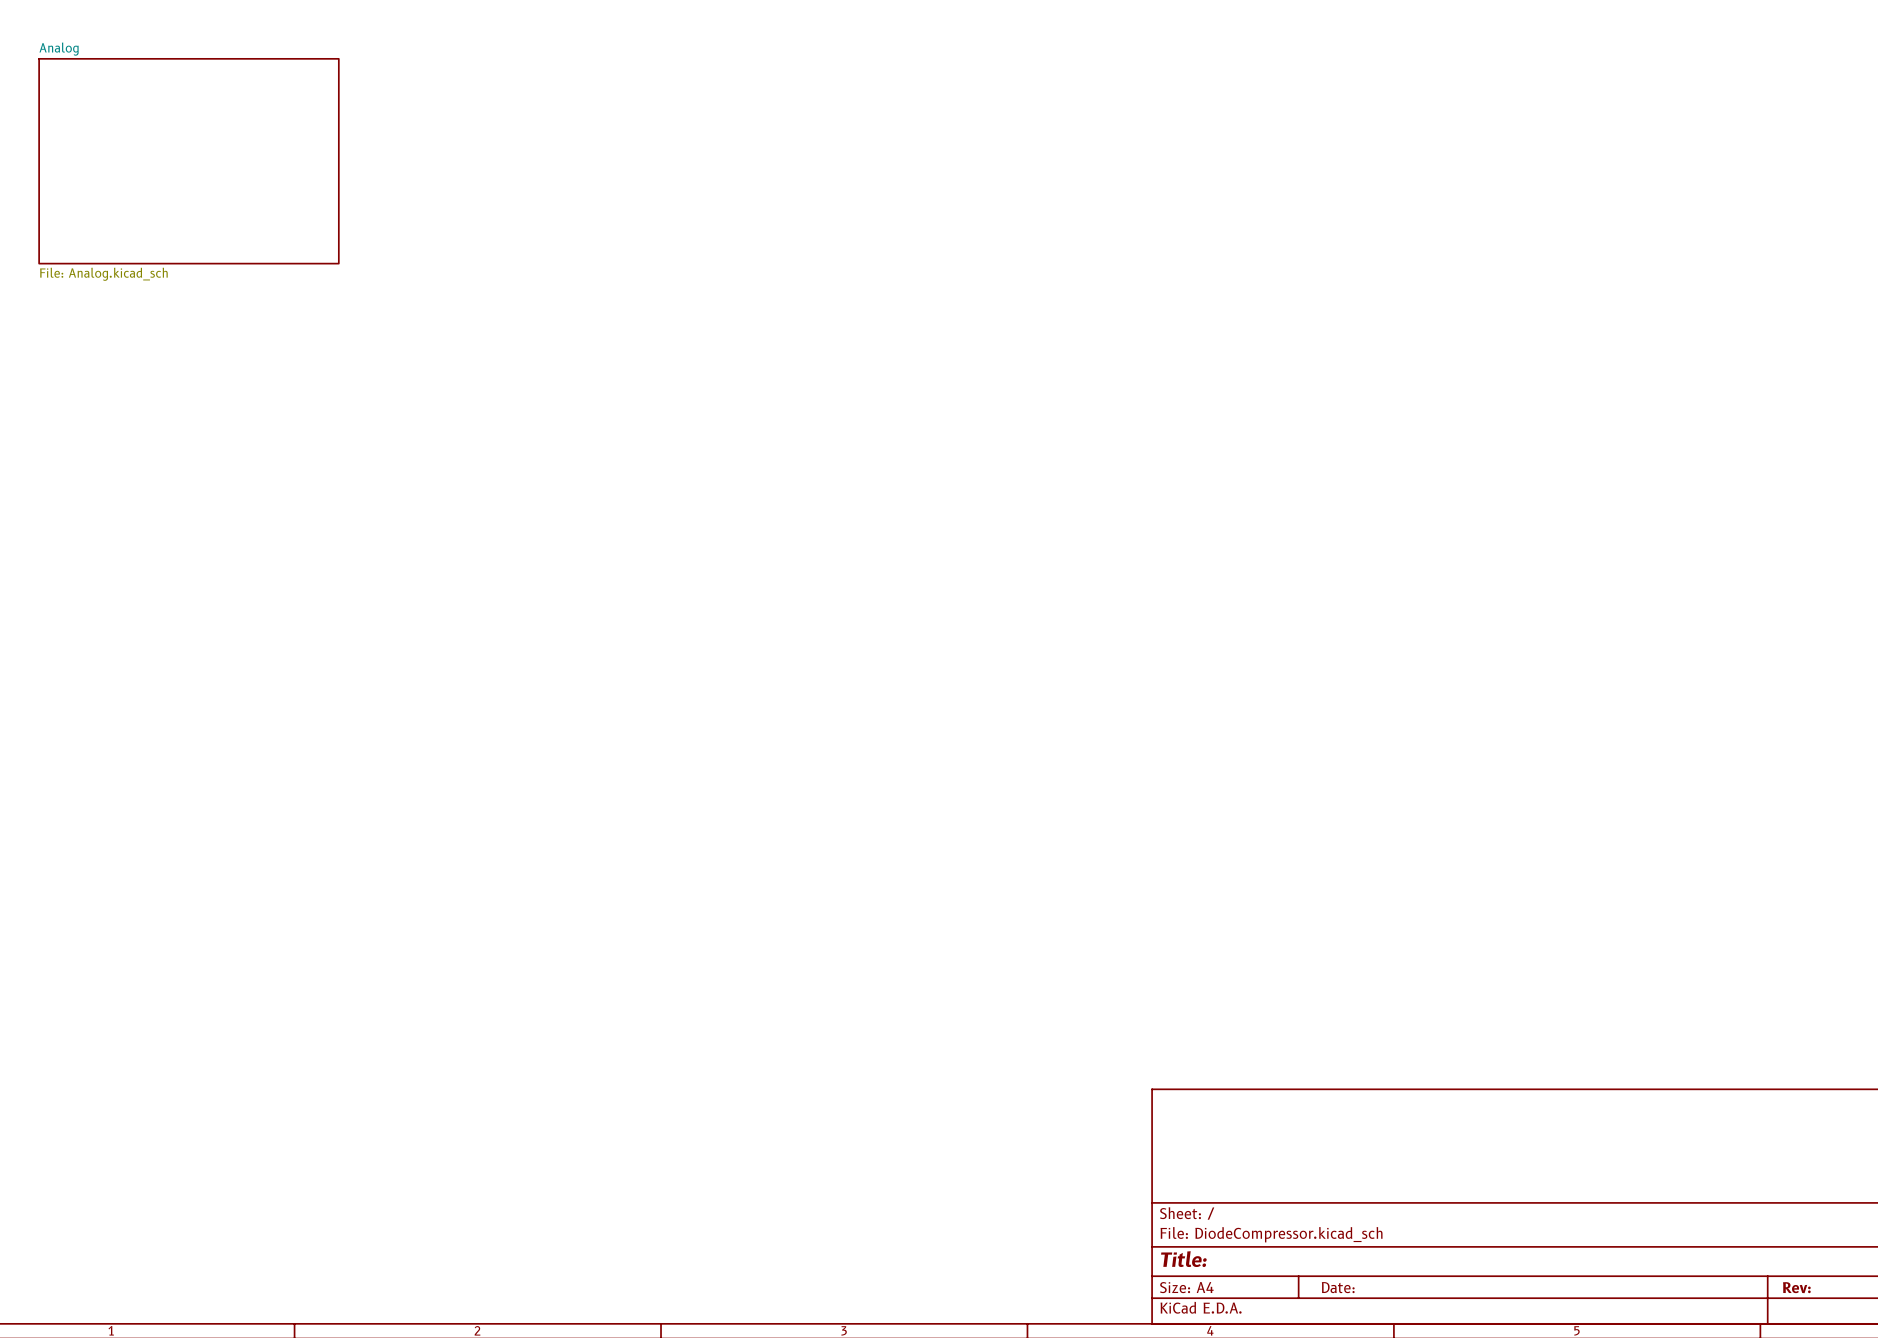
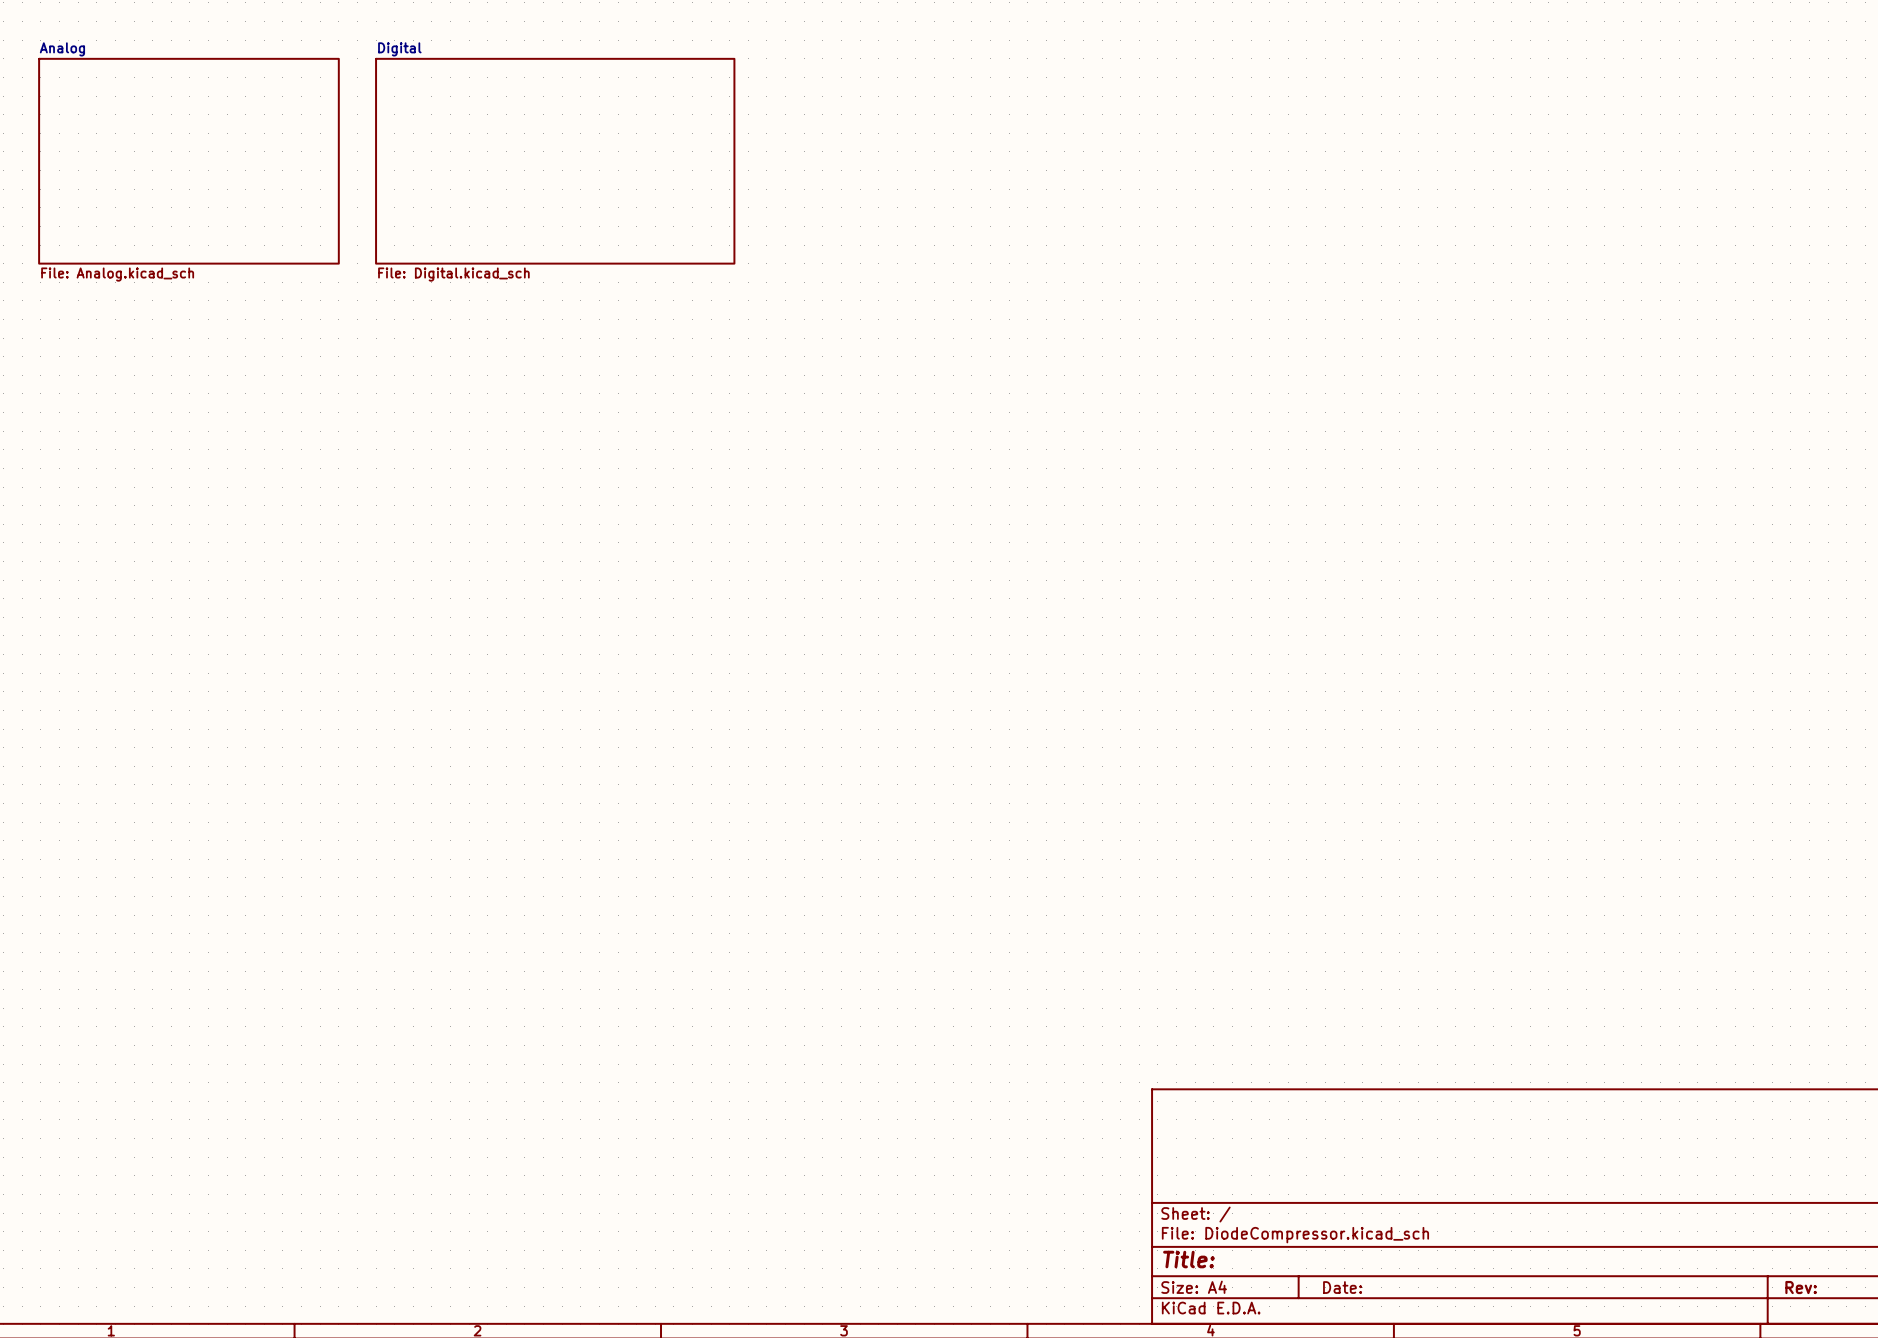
sheet Digital: none -> File: Digital.kicad_sch (555, 161)

